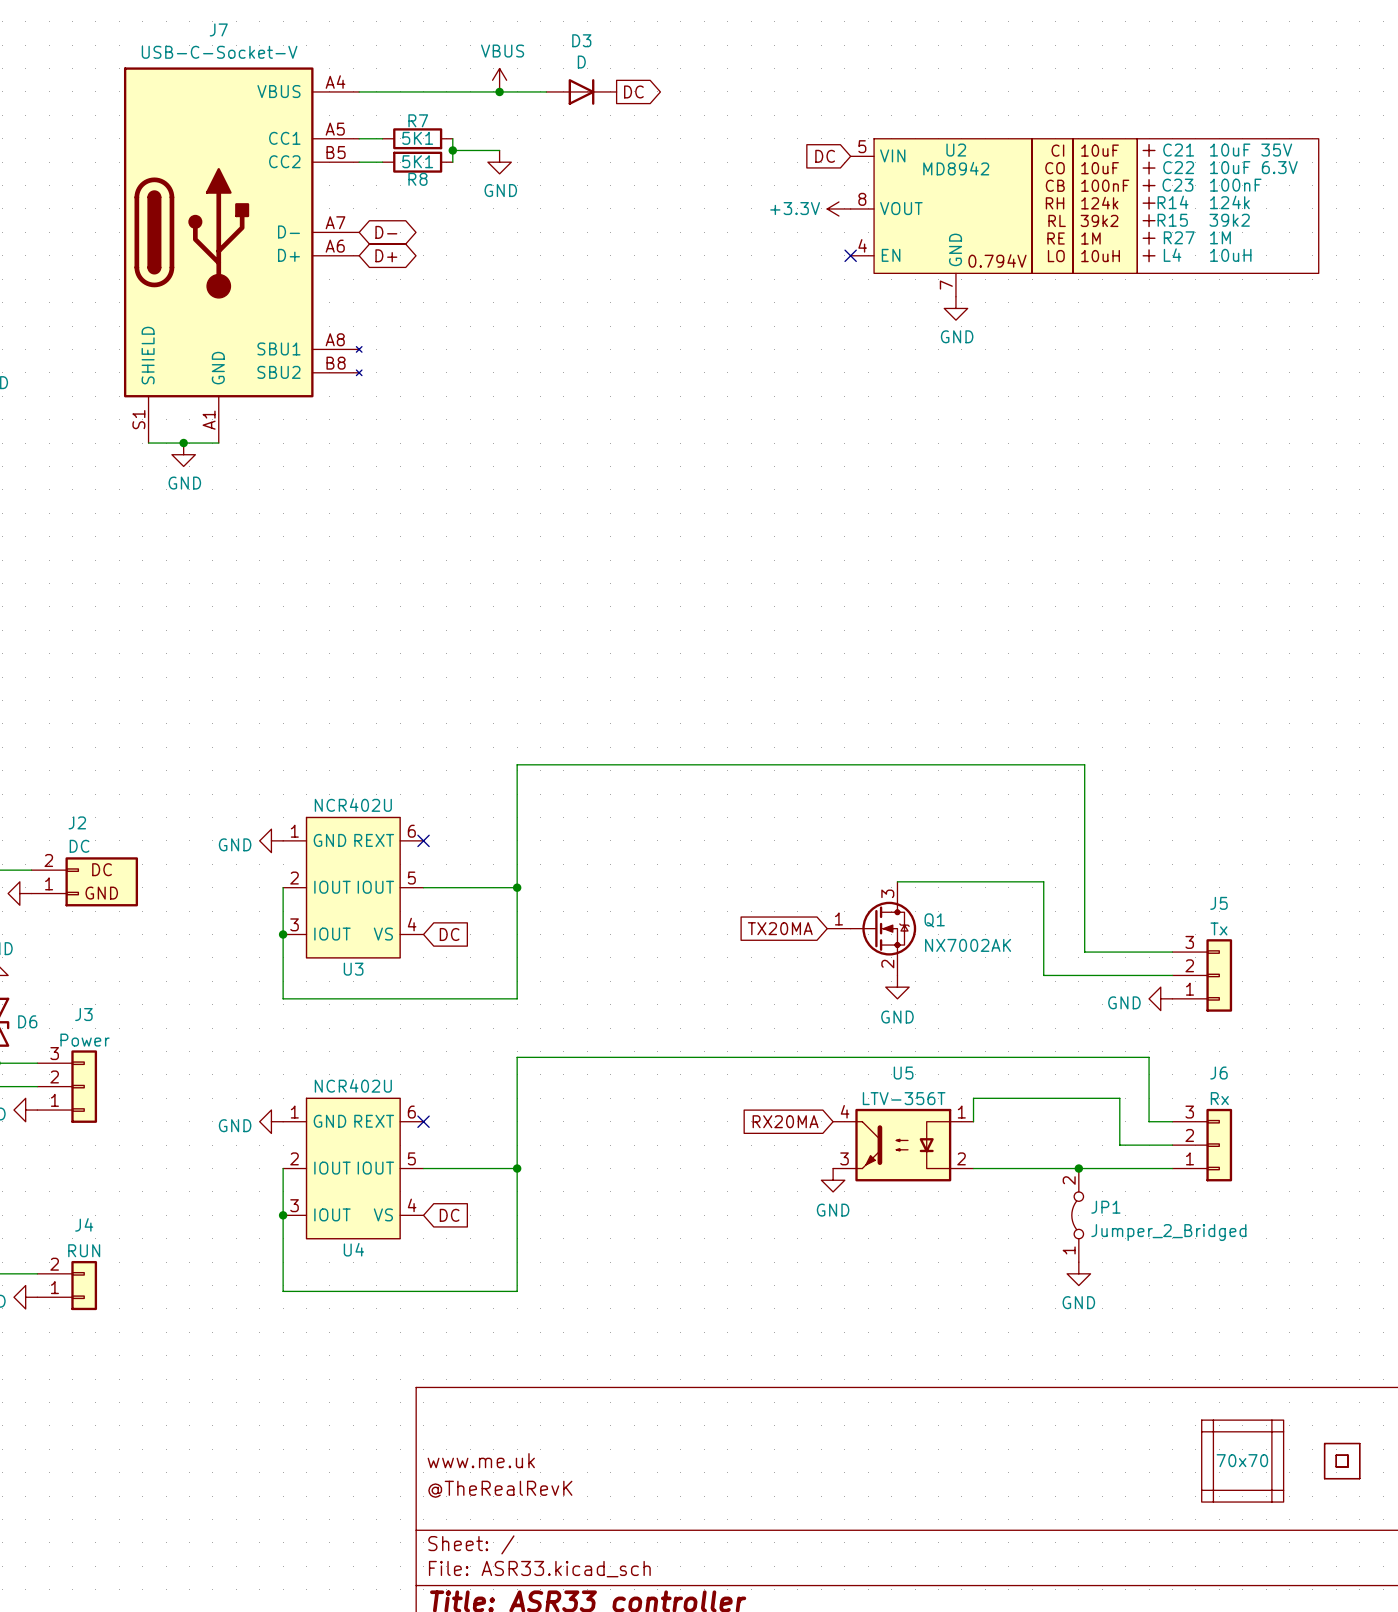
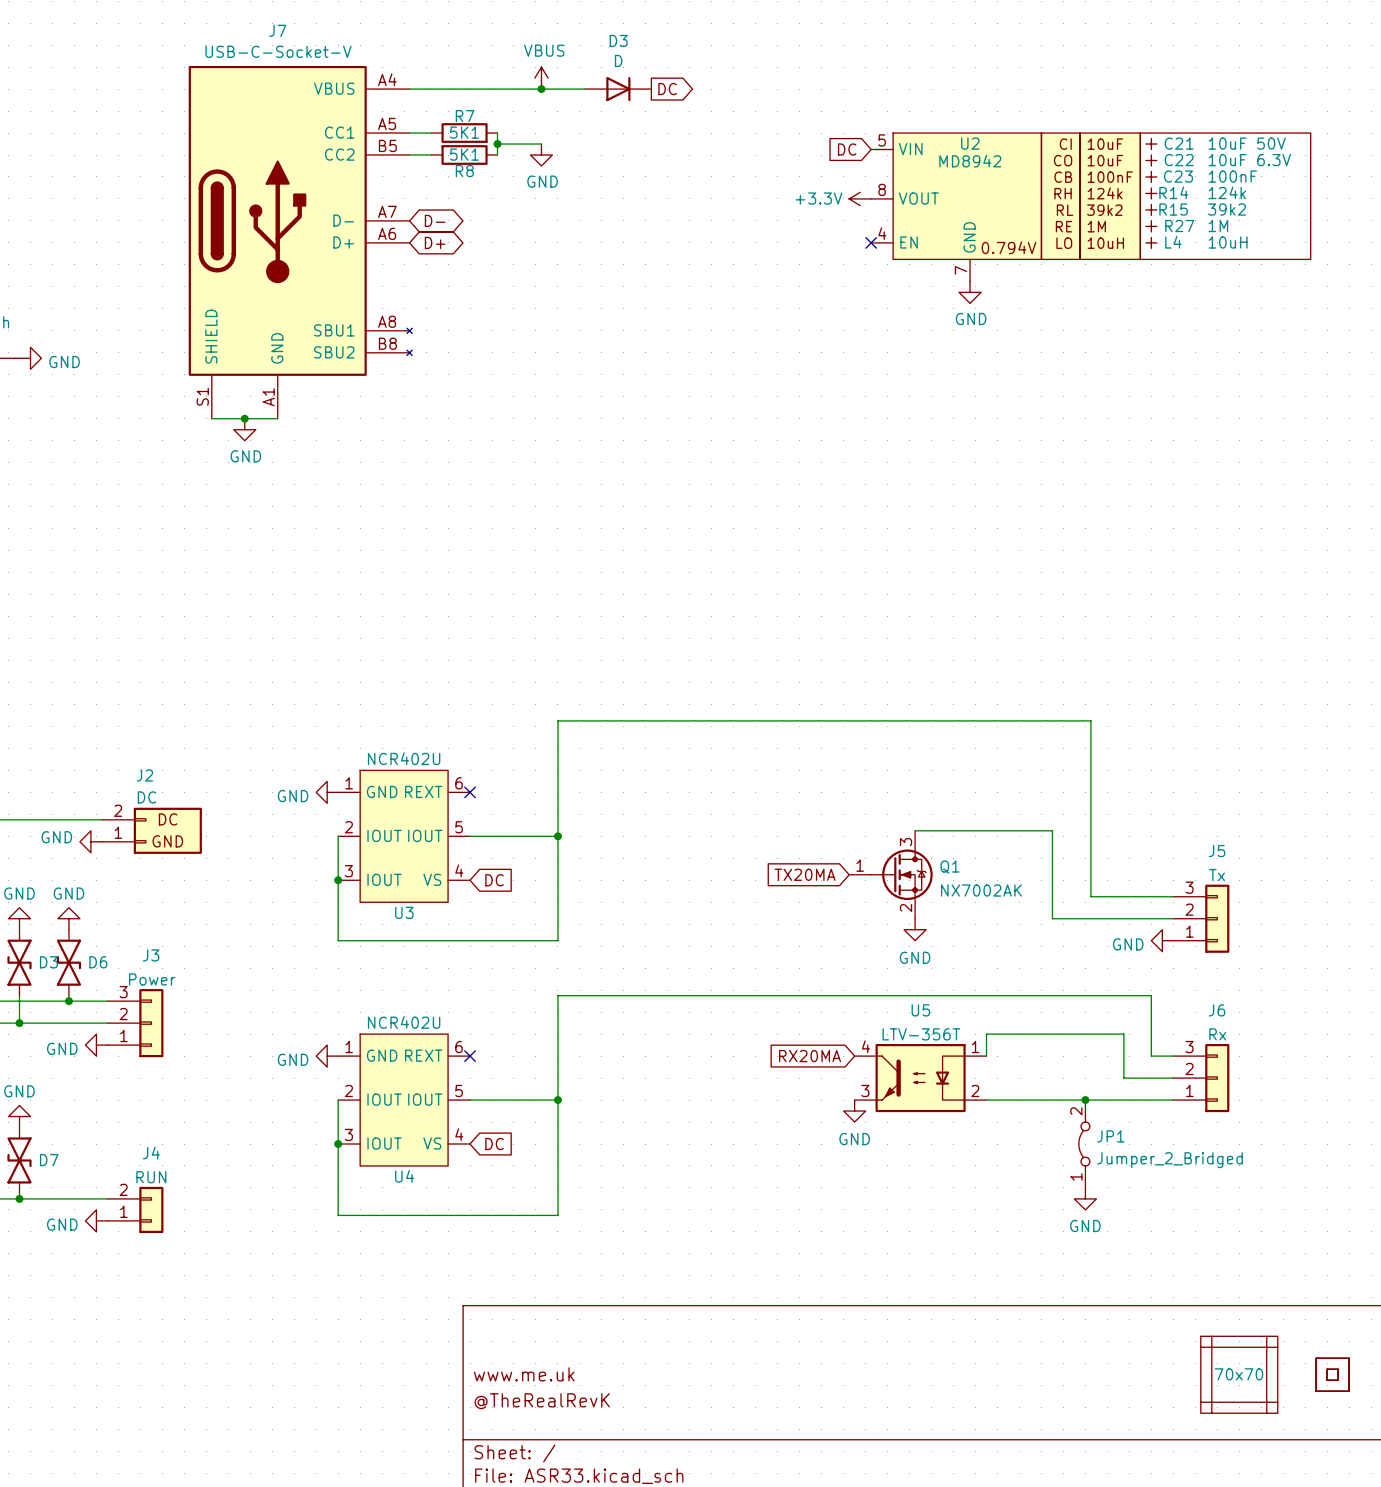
C21 value: 10uF 35V (1251, 150) -> 10uF 50V (1247, 143)

